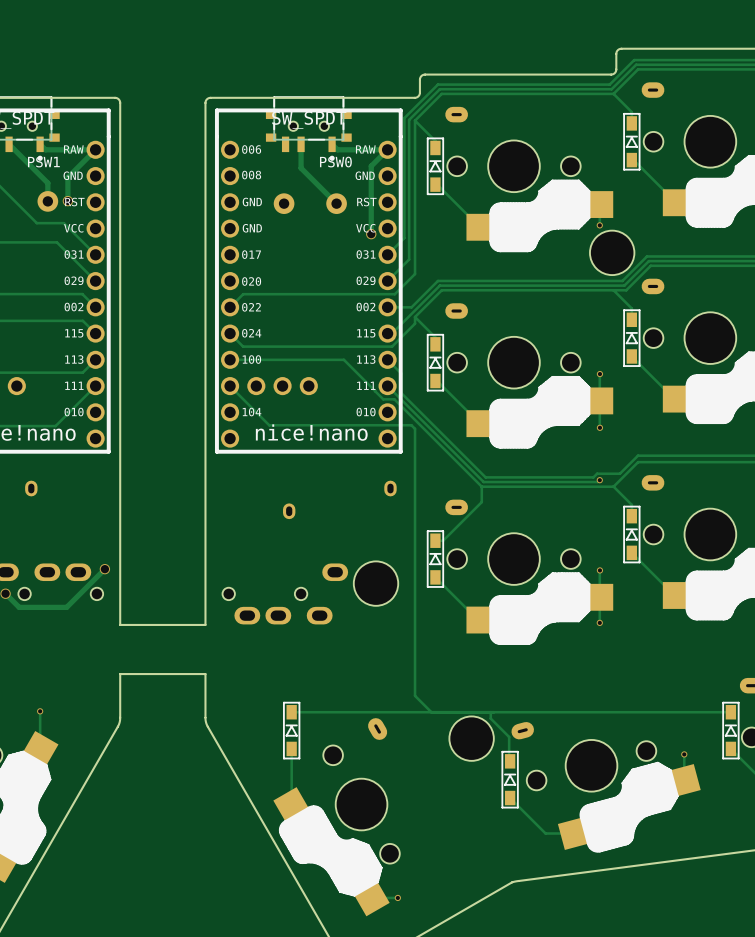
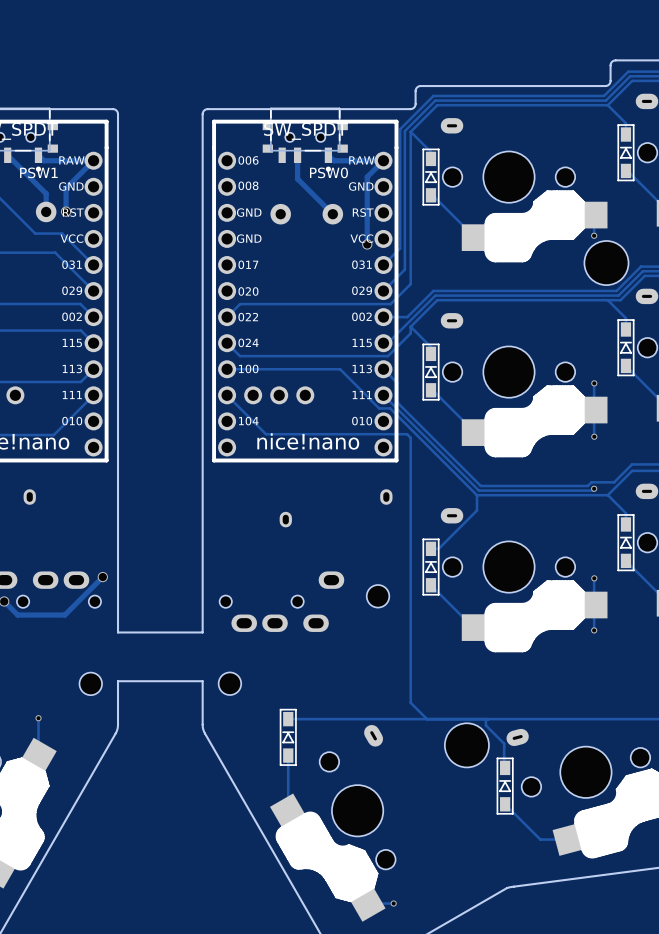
part footprint: [353, 561, 399, 606] -> [366, 585, 390, 608]
part: none -> (90, 683)
part: none -> (229, 683)

